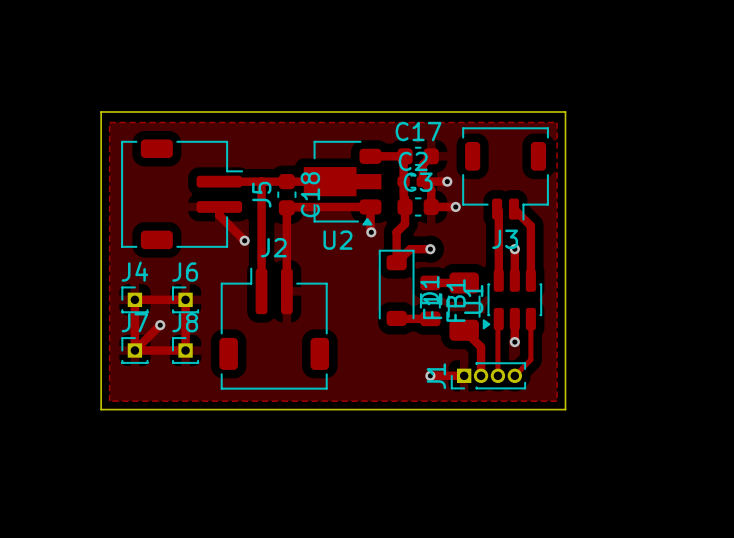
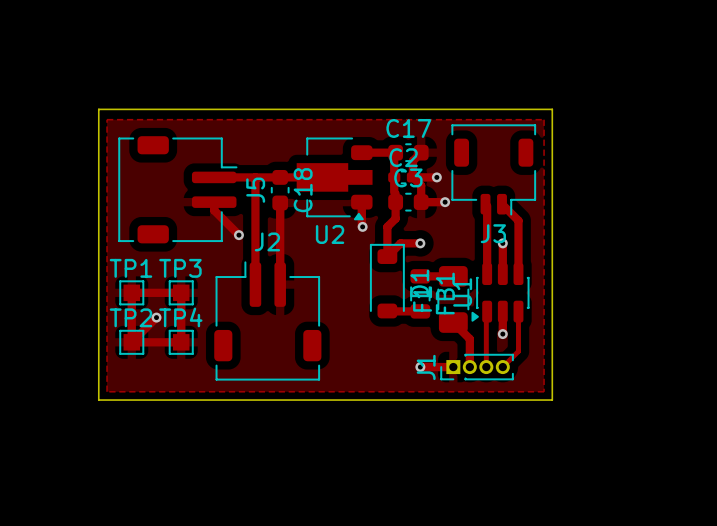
track: (370, 206) (286, 207) -> none
J4: (134, 299) -> none
TP1: none -> (131, 292)
J6: (185, 299) -> none
TP3: none -> (181, 292)
J7: (134, 350) -> none
TP2: none -> (131, 342)
J8: (185, 350) -> none
TP4: none -> (181, 342)

